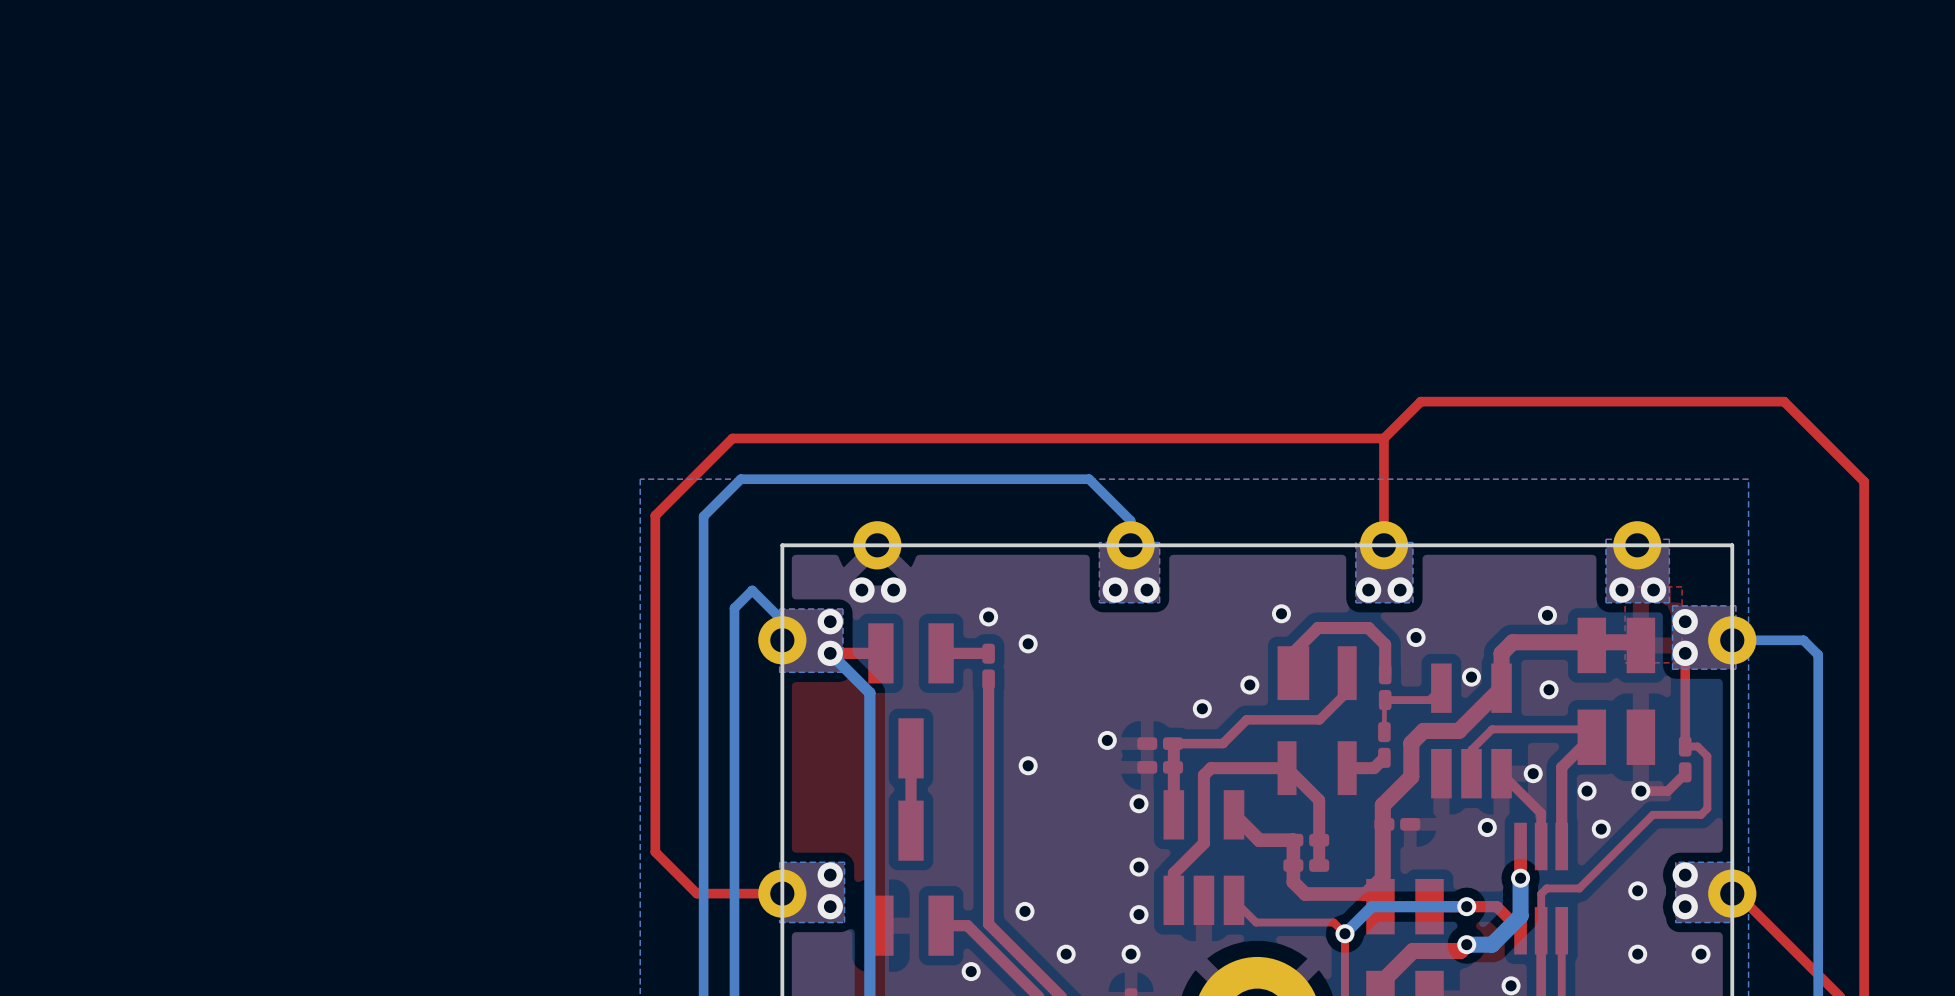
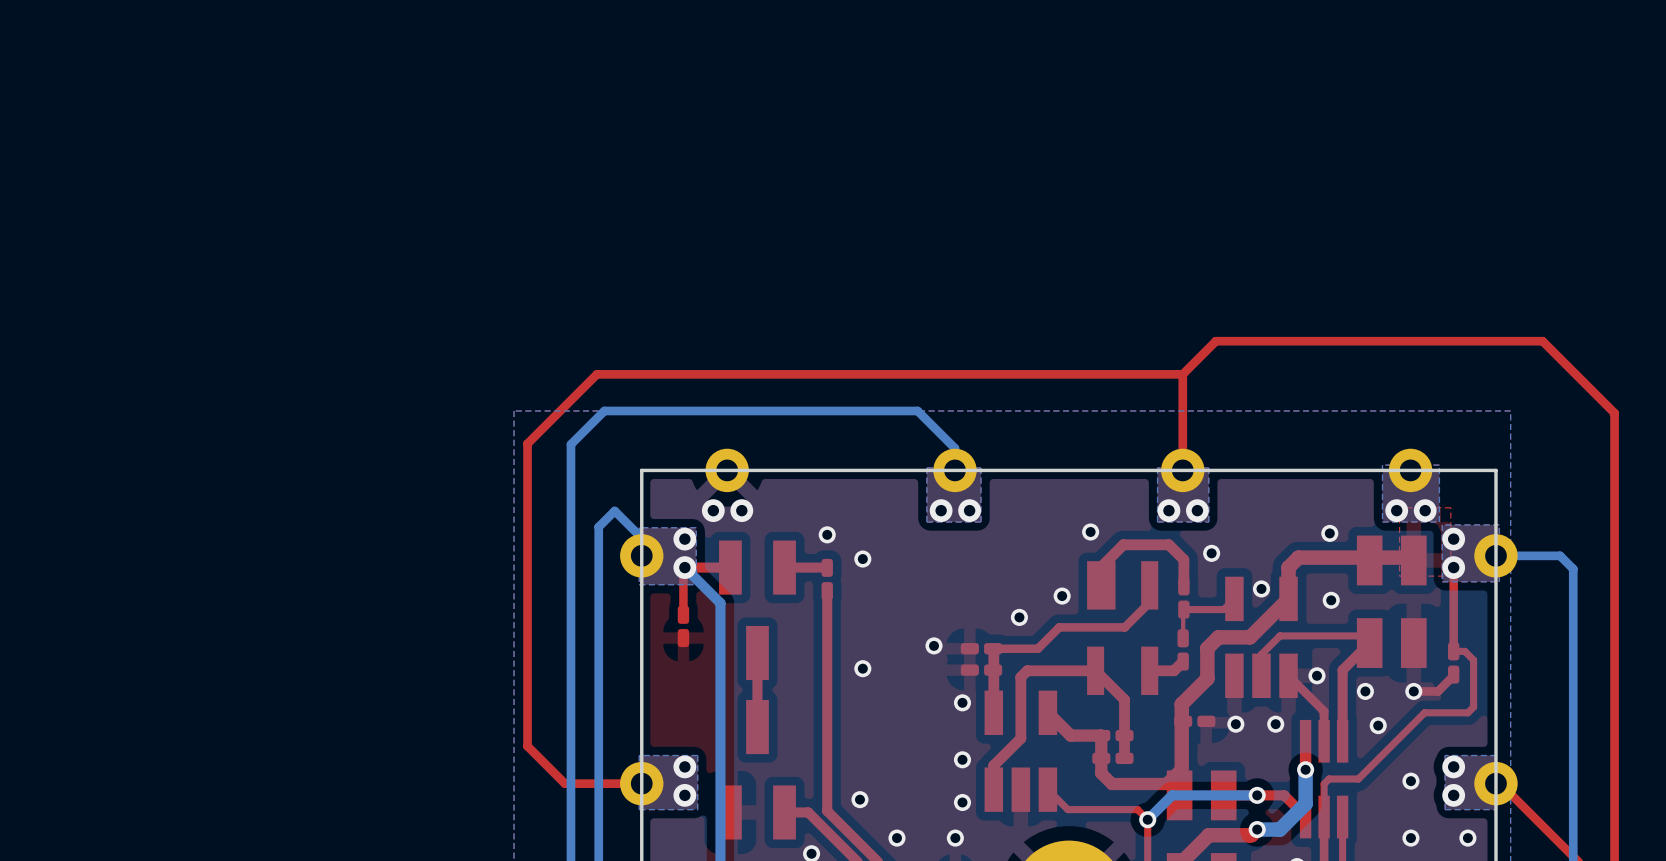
top track: none -> (684, 567) (683, 614)
part: none -> (683, 626)
via: none -> (1235, 724)

